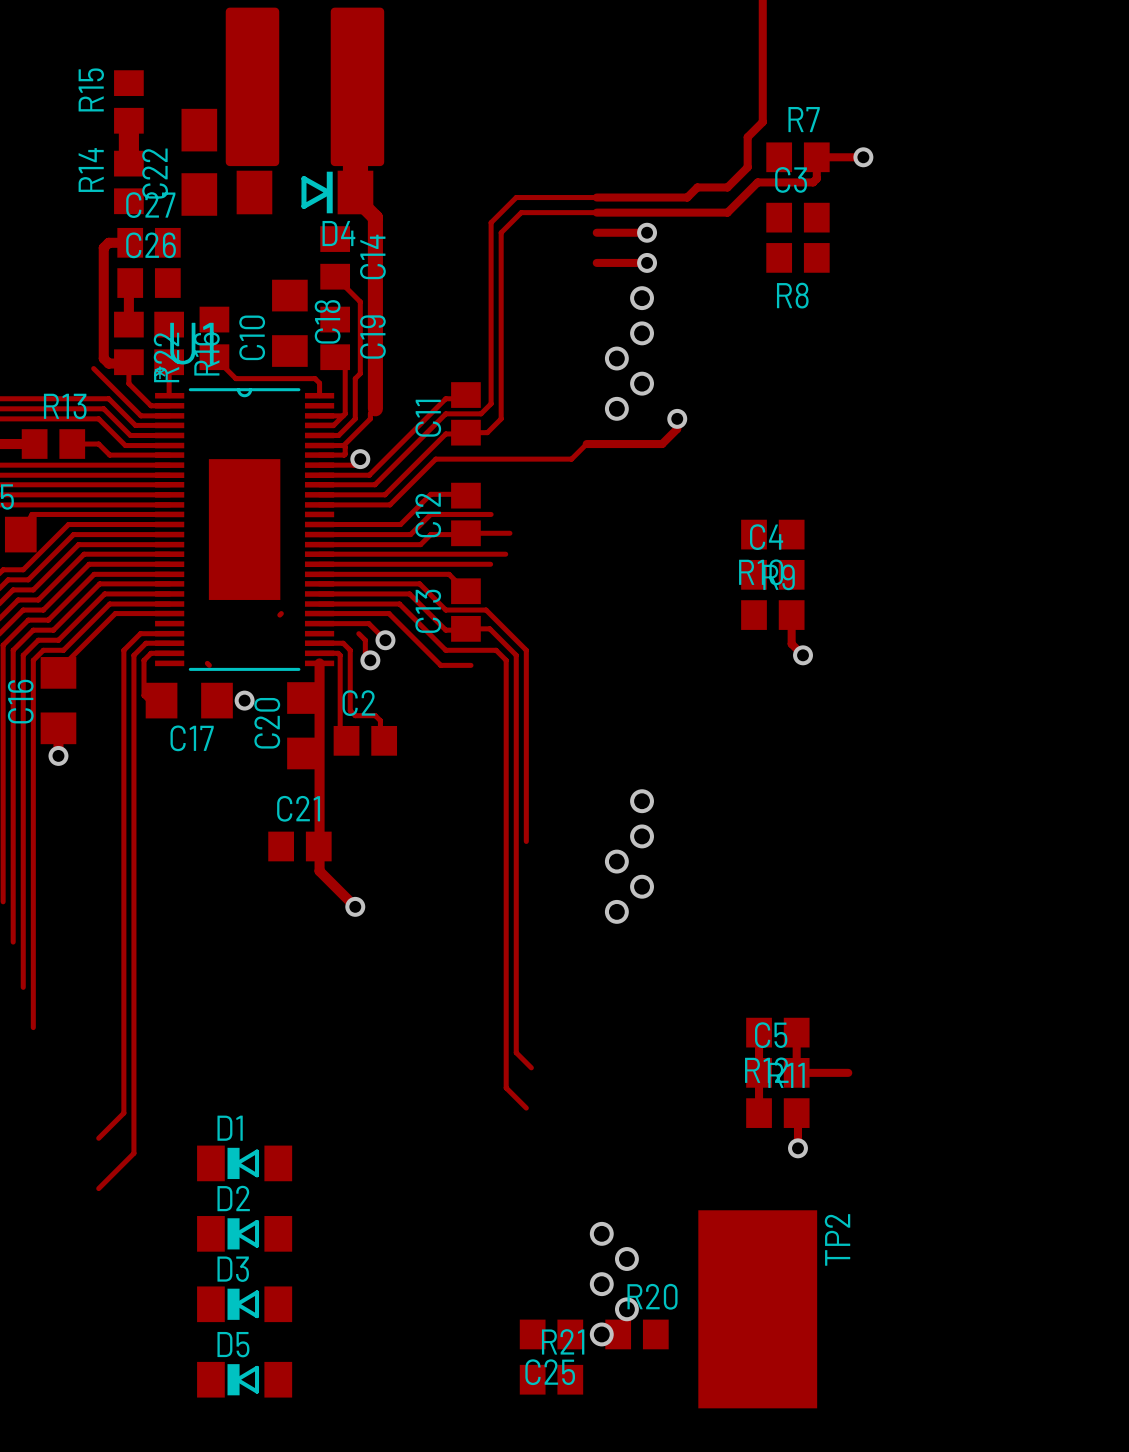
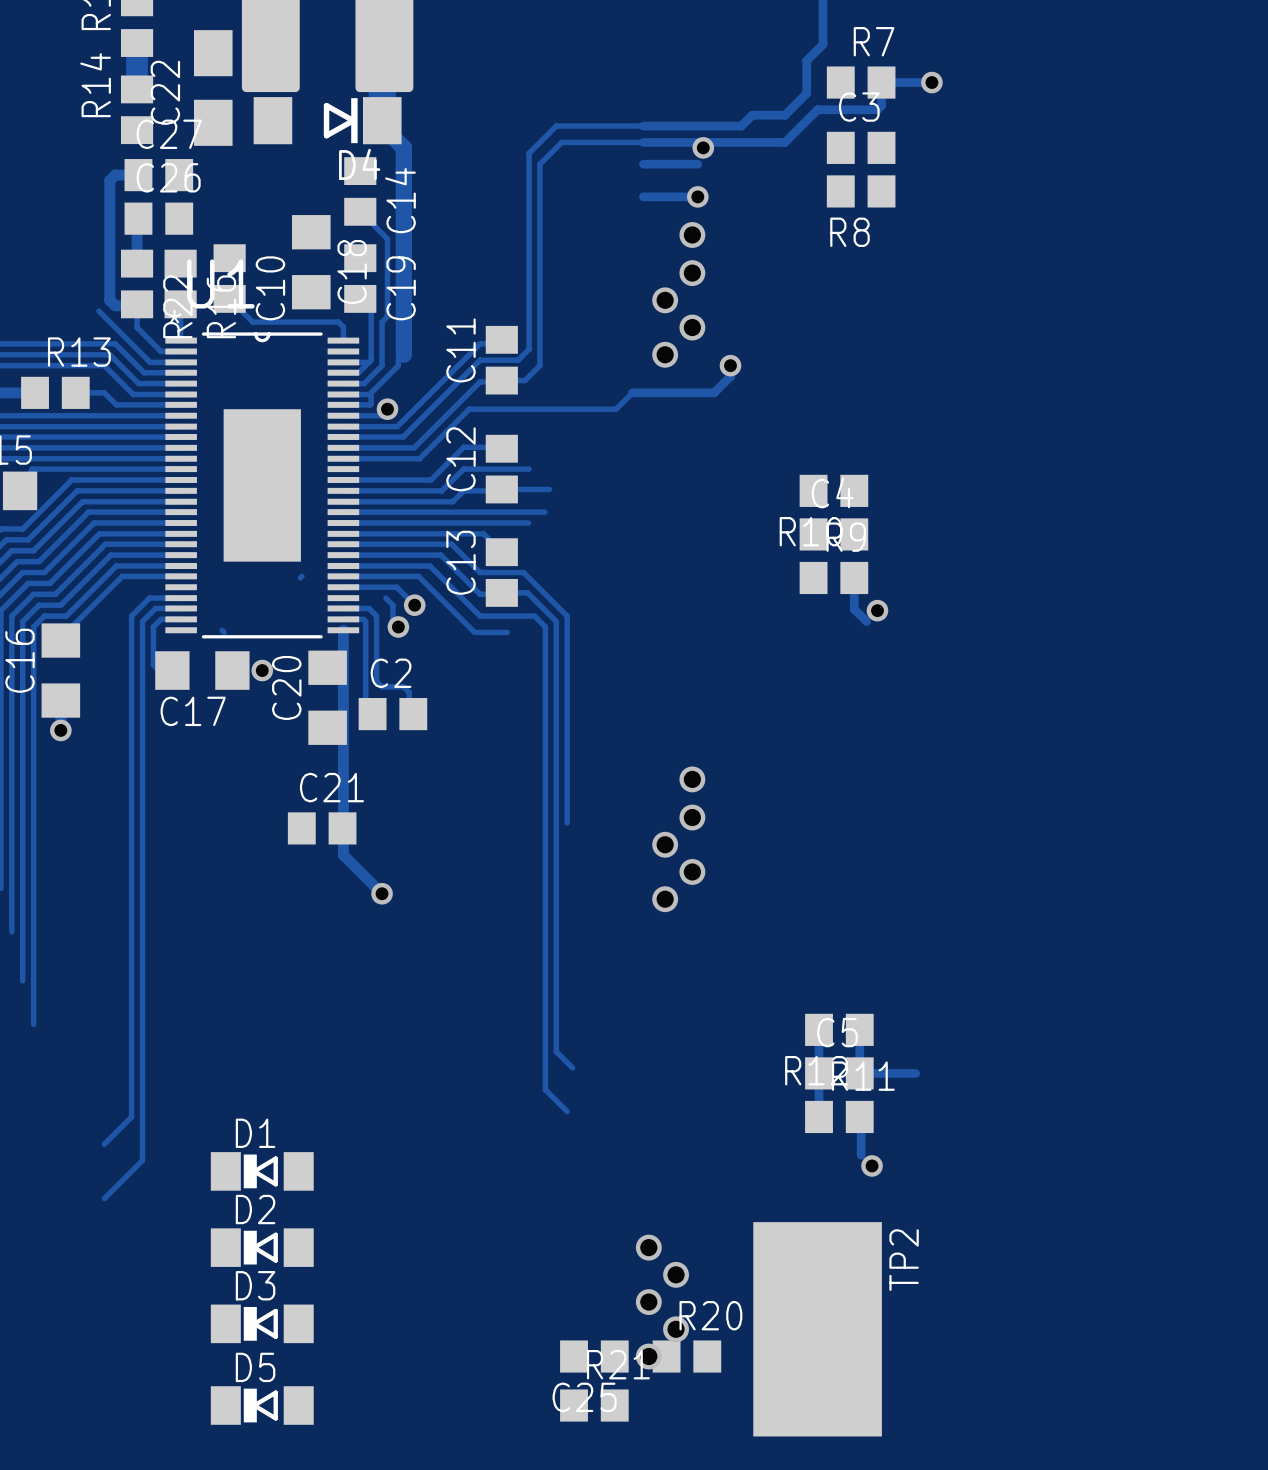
via position: (647, 232) -> (703, 147)
via position: (803, 655) -> (877, 610)
via position: (797, 1148) -> (872, 1165)

